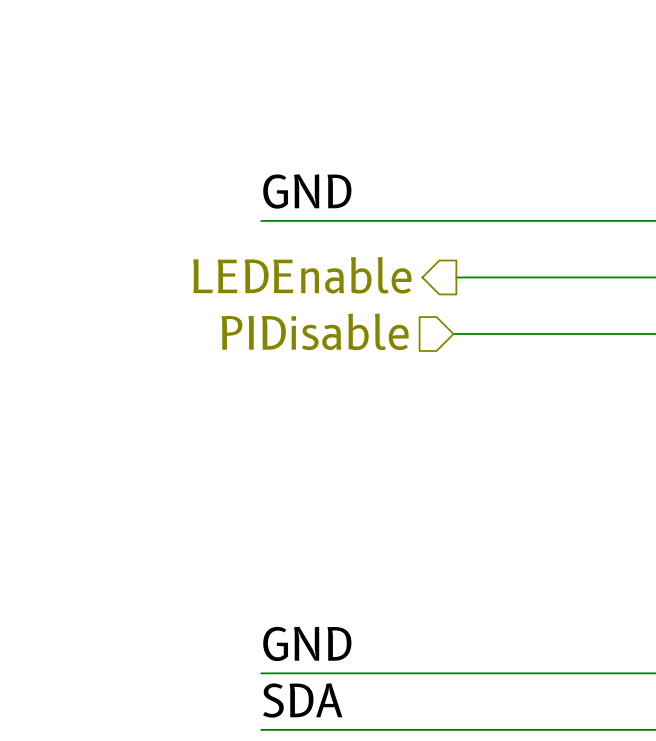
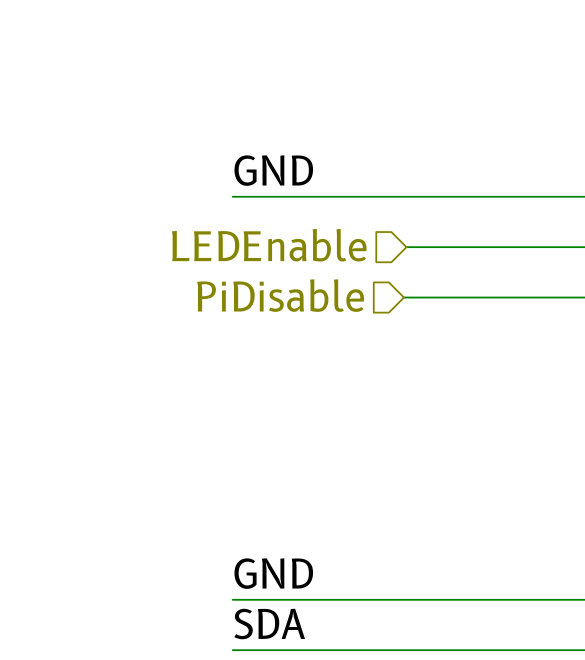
hierarchical label shape: output (302, 275) -> input (269, 245)
hierarchical label: PIDisable (315, 331) -> PiDisable (280, 295)

